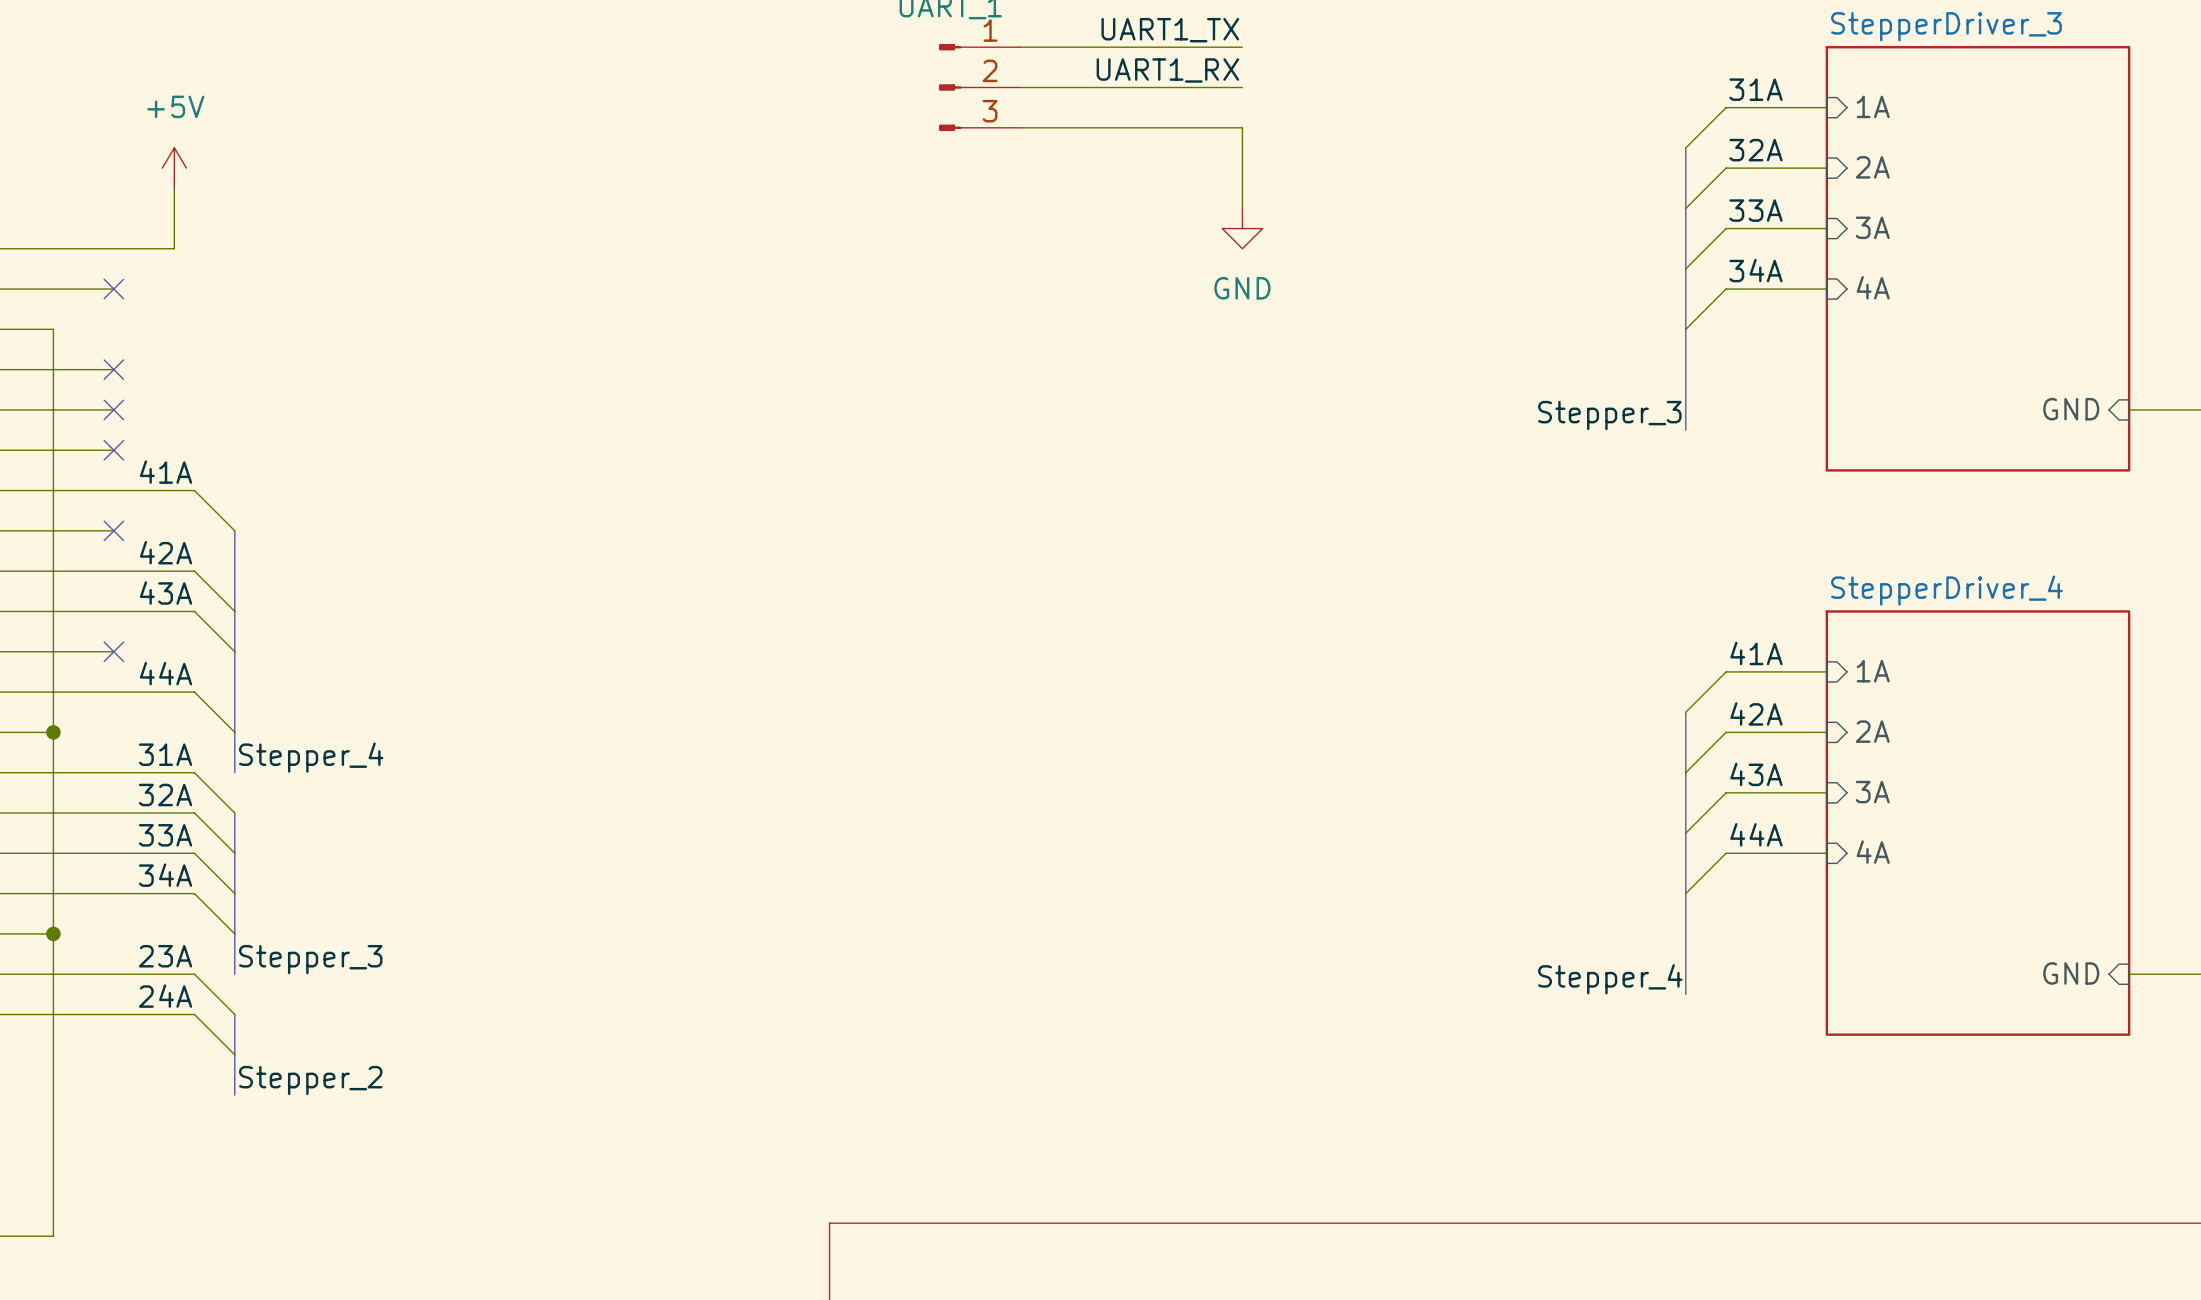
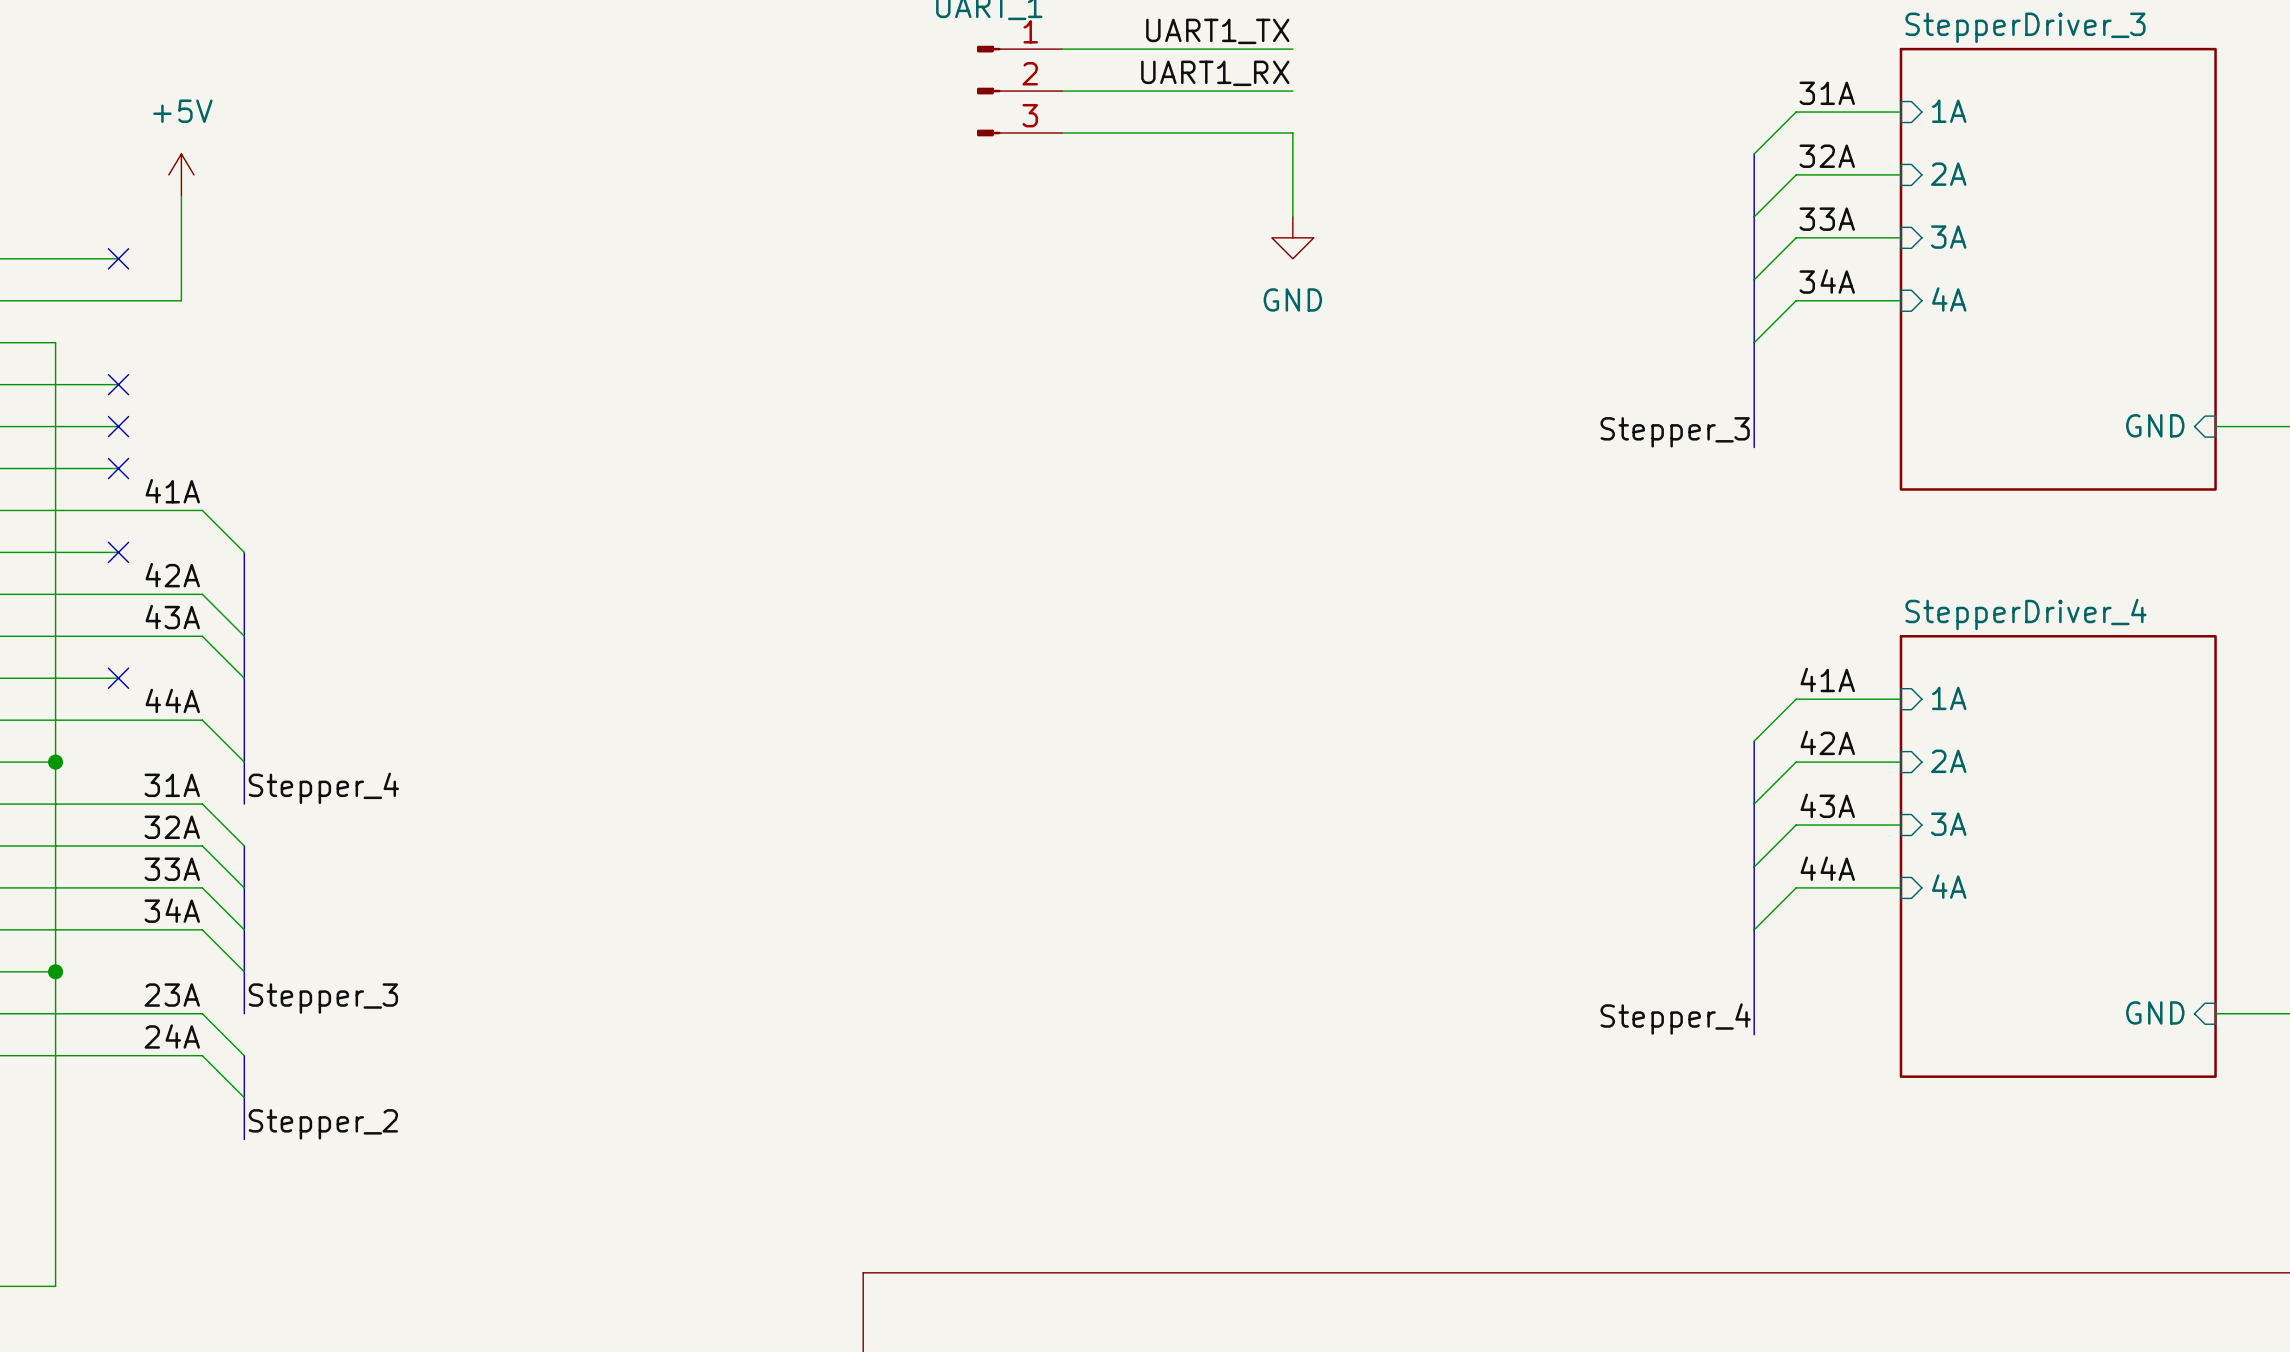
wire: (113, 248) (174, 248) -> (118, 300) (181, 300) (181, 258)
no-connect mark position: (113, 289) -> (118, 258)

